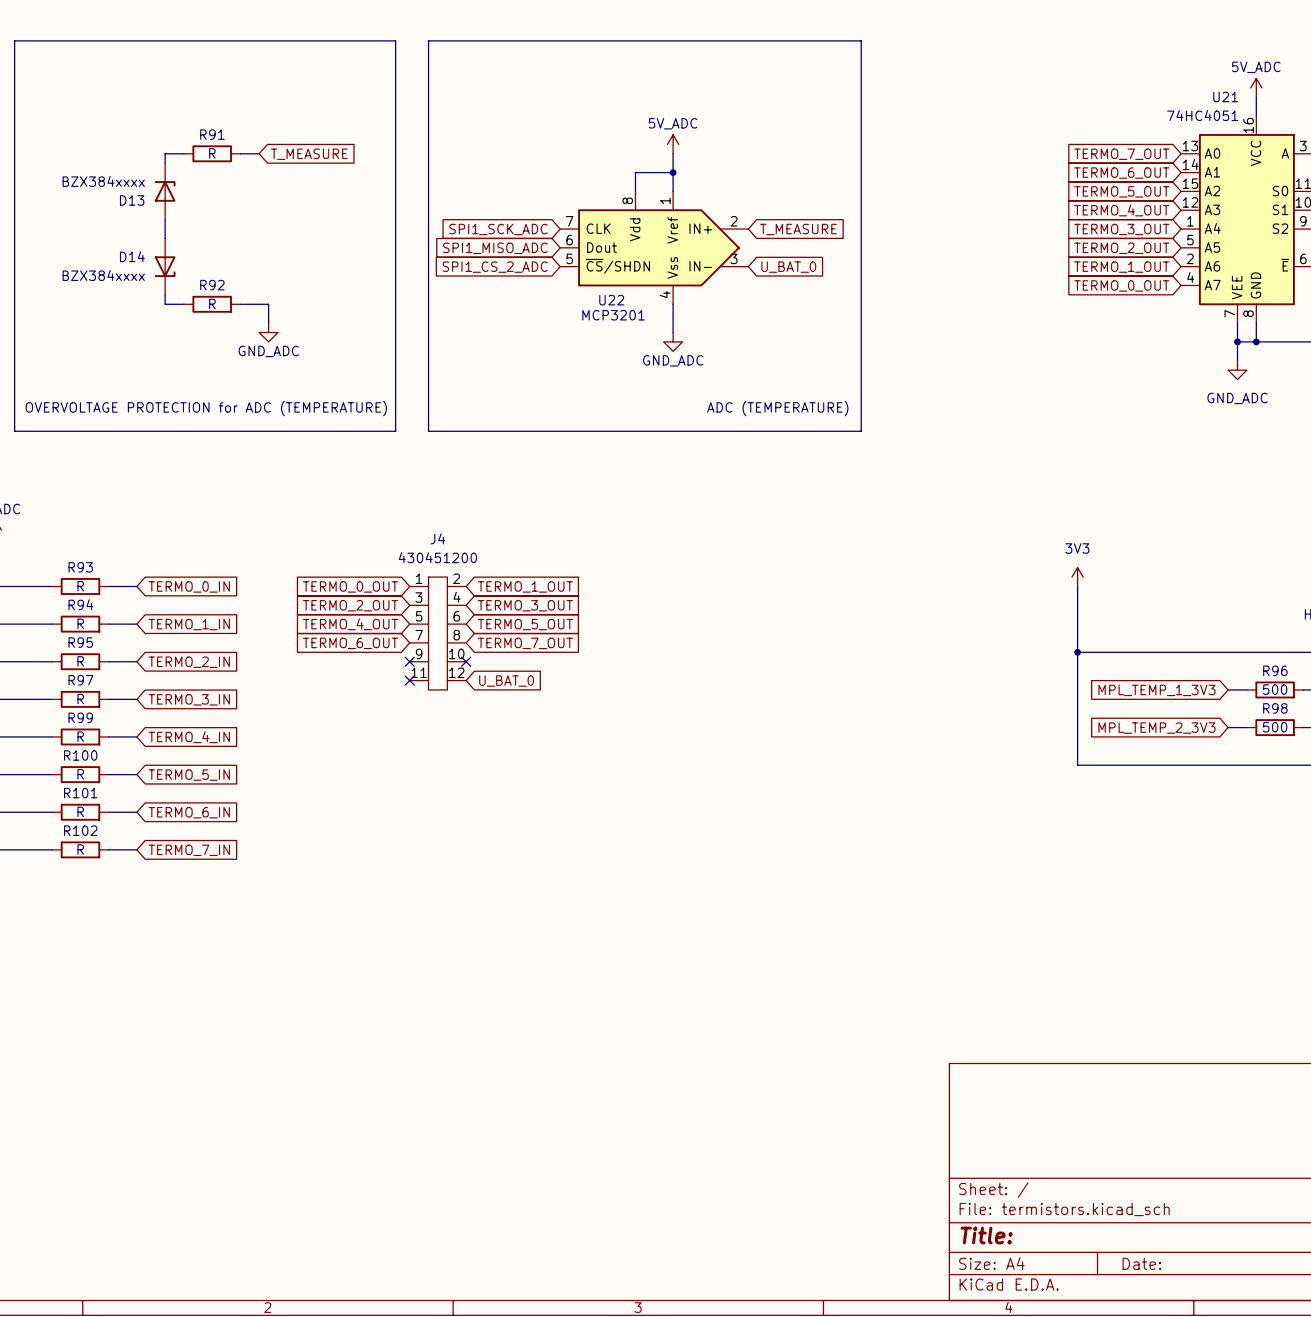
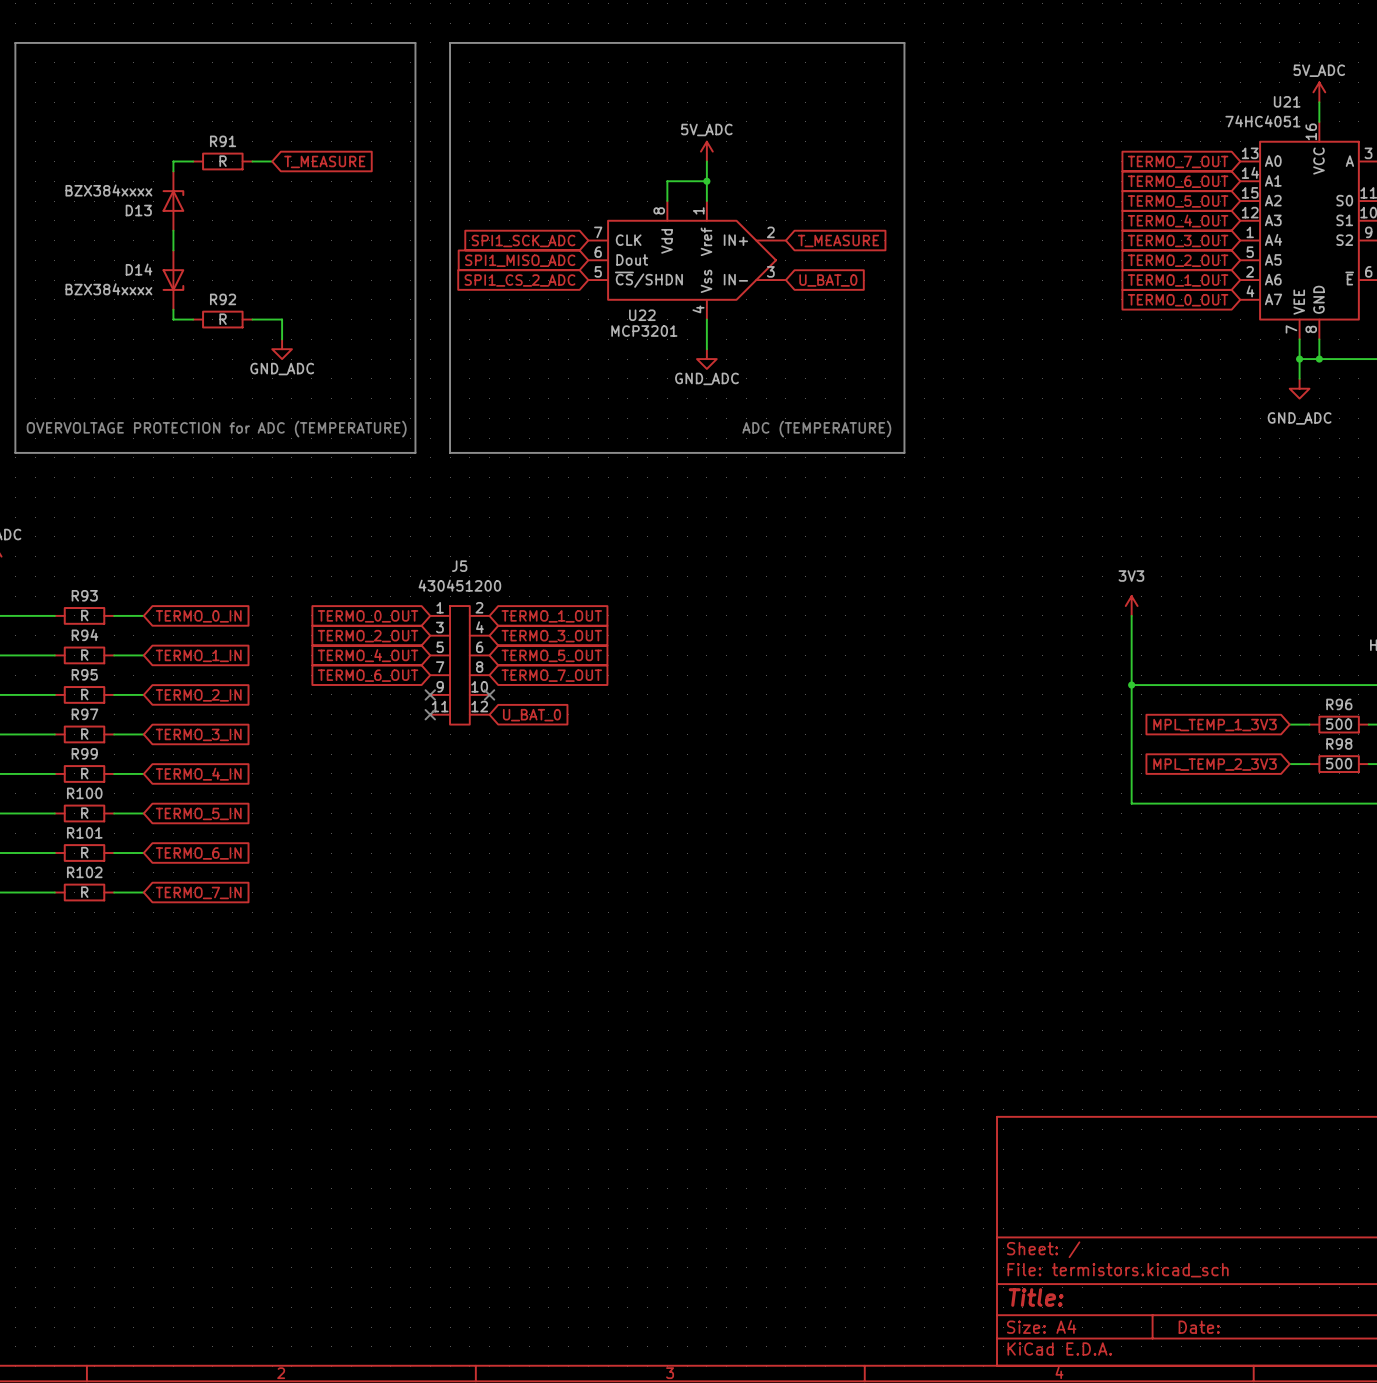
J4 name: J4 (437, 538) -> J5 (459, 566)

